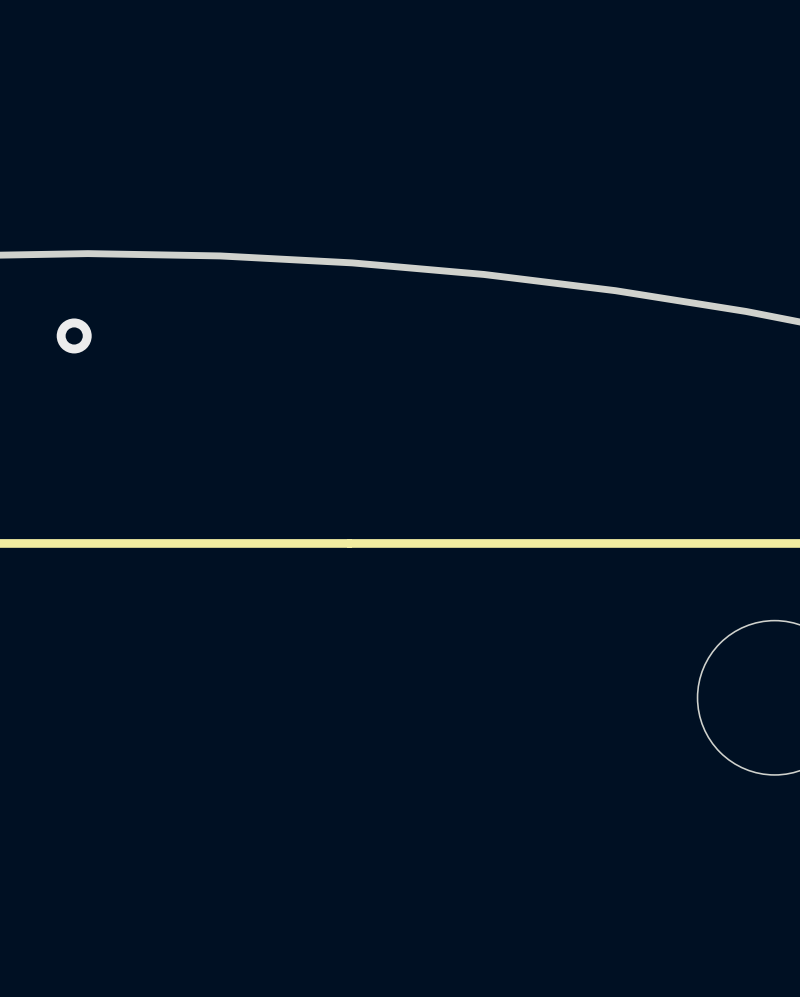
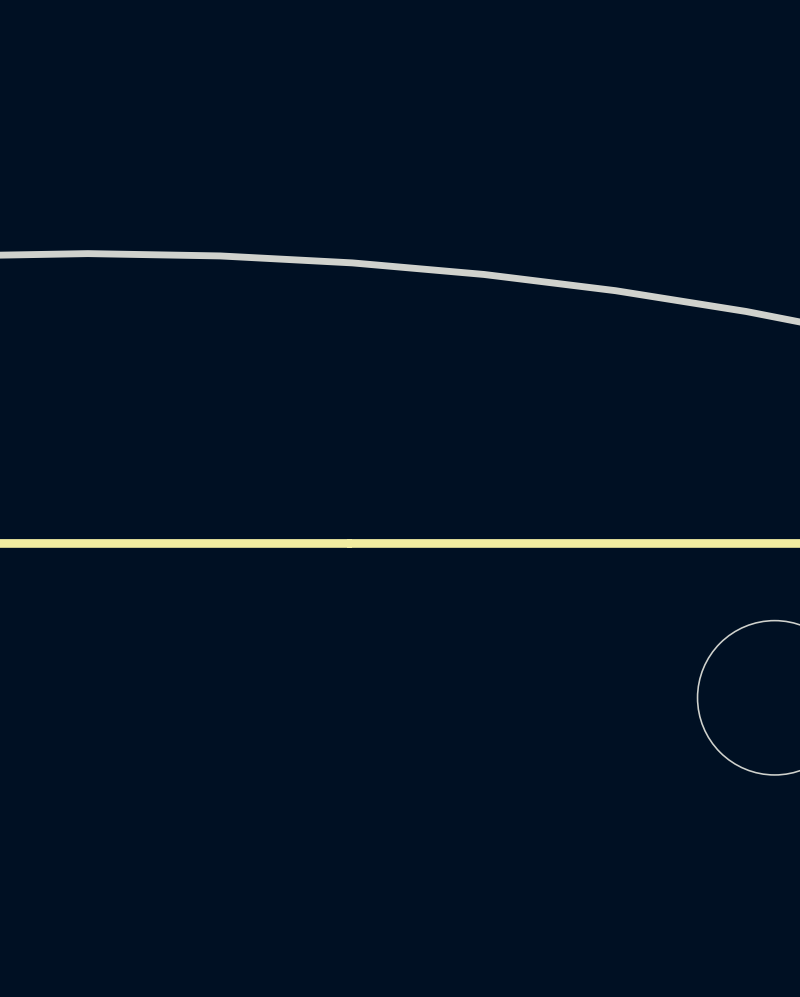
via: (74, 335) -> none

